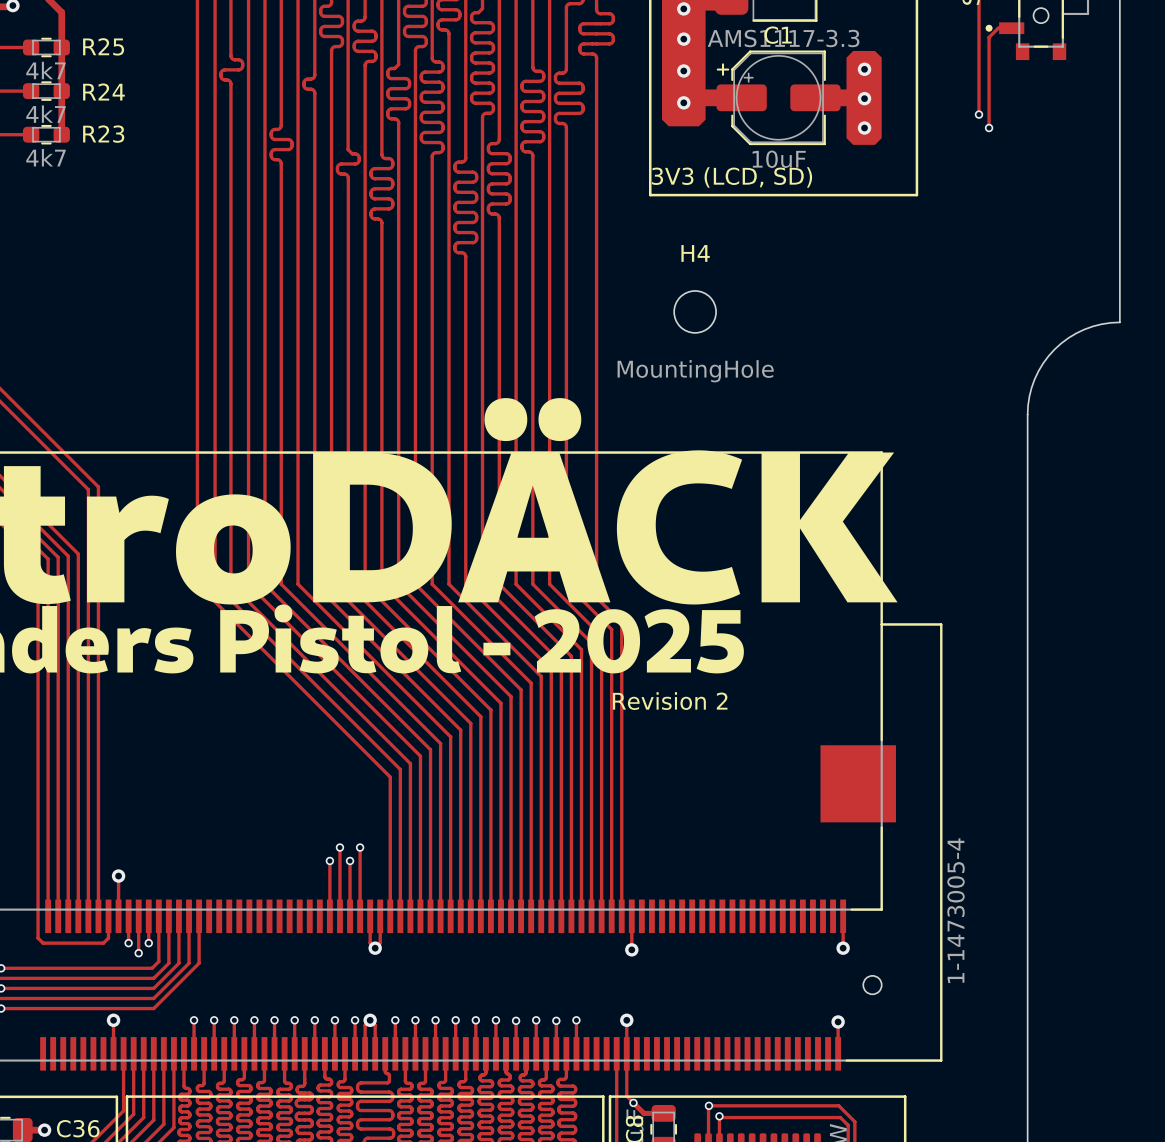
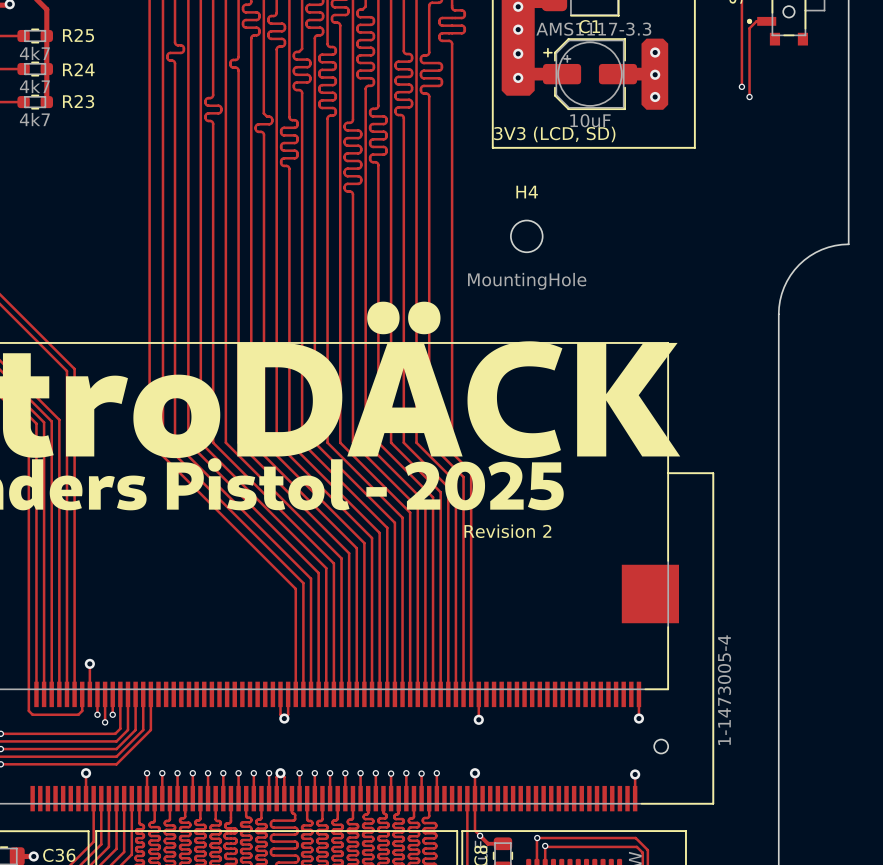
track: (339, 847) (339, 916) -> none
via: (339, 847) -> none
track: (360, 847) (360, 916) -> none
via: (360, 847) -> none
track: (329, 860) (329, 916) -> none
via: (329, 860) -> none
track: (350, 860) (350, 916) -> none
via: (350, 860) -> none

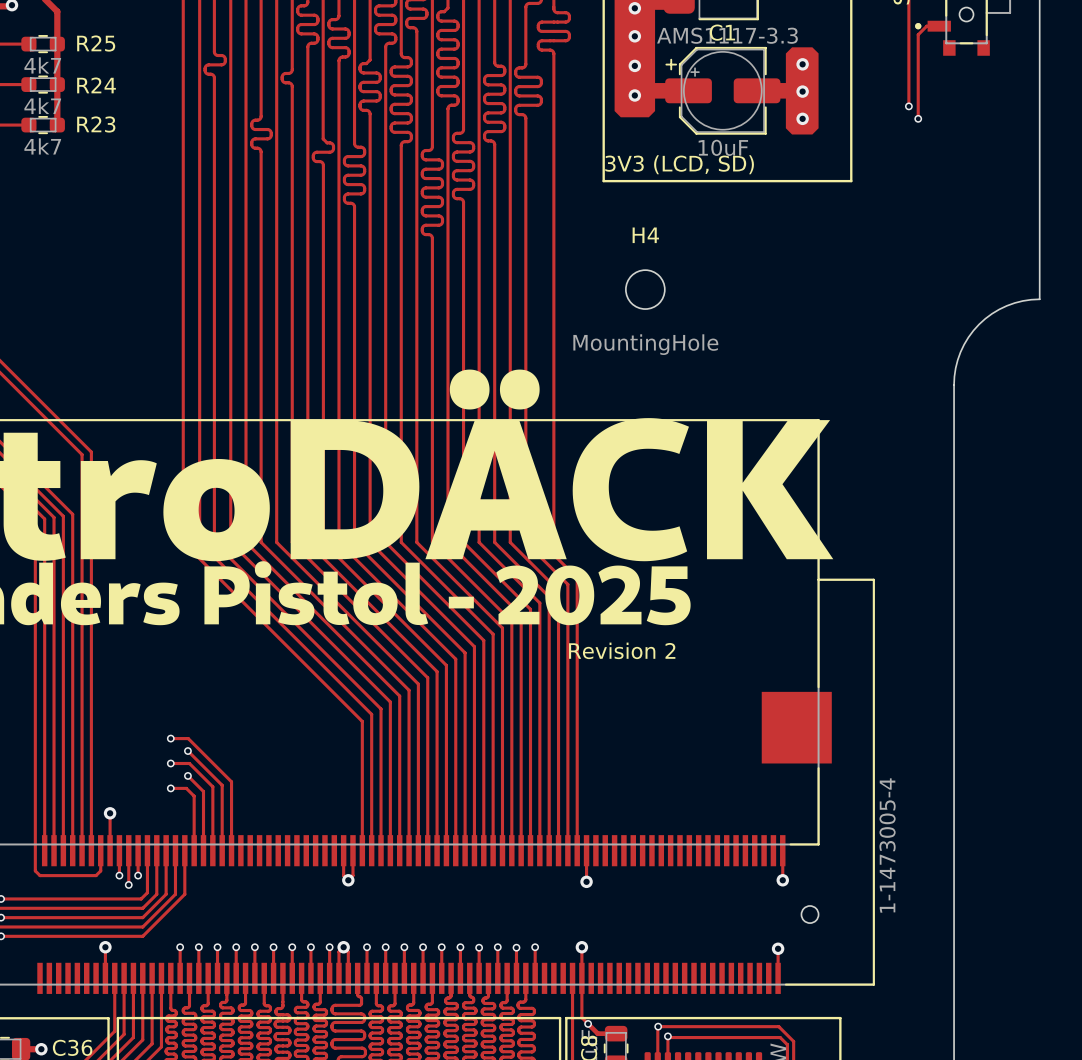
track: none -> (170, 738) (188, 738) (231, 781) (231, 850)
via: none -> (170, 738)
track: none -> (187, 751) (222, 785) (222, 850)
via: none -> (187, 751)
track: none -> (170, 763) (189, 763) (212, 786) (212, 850)
via: none -> (170, 763)
track: none -> (187, 775) (203, 791) (203, 850)
via: none -> (187, 775)
track: none -> (170, 788) (186, 788) (194, 796) (194, 850)
via: none -> (170, 788)

